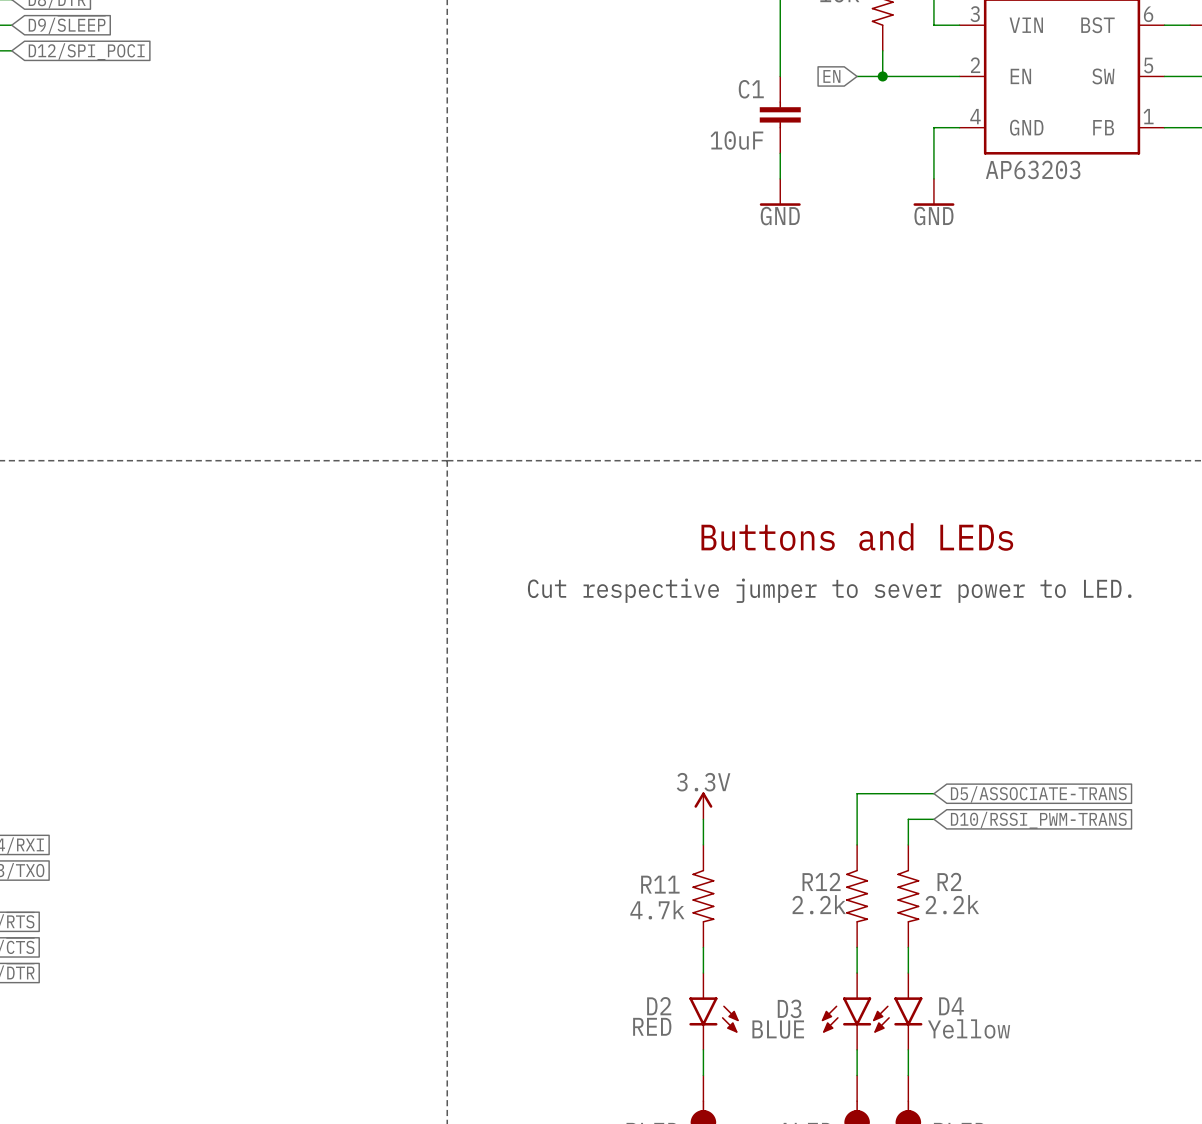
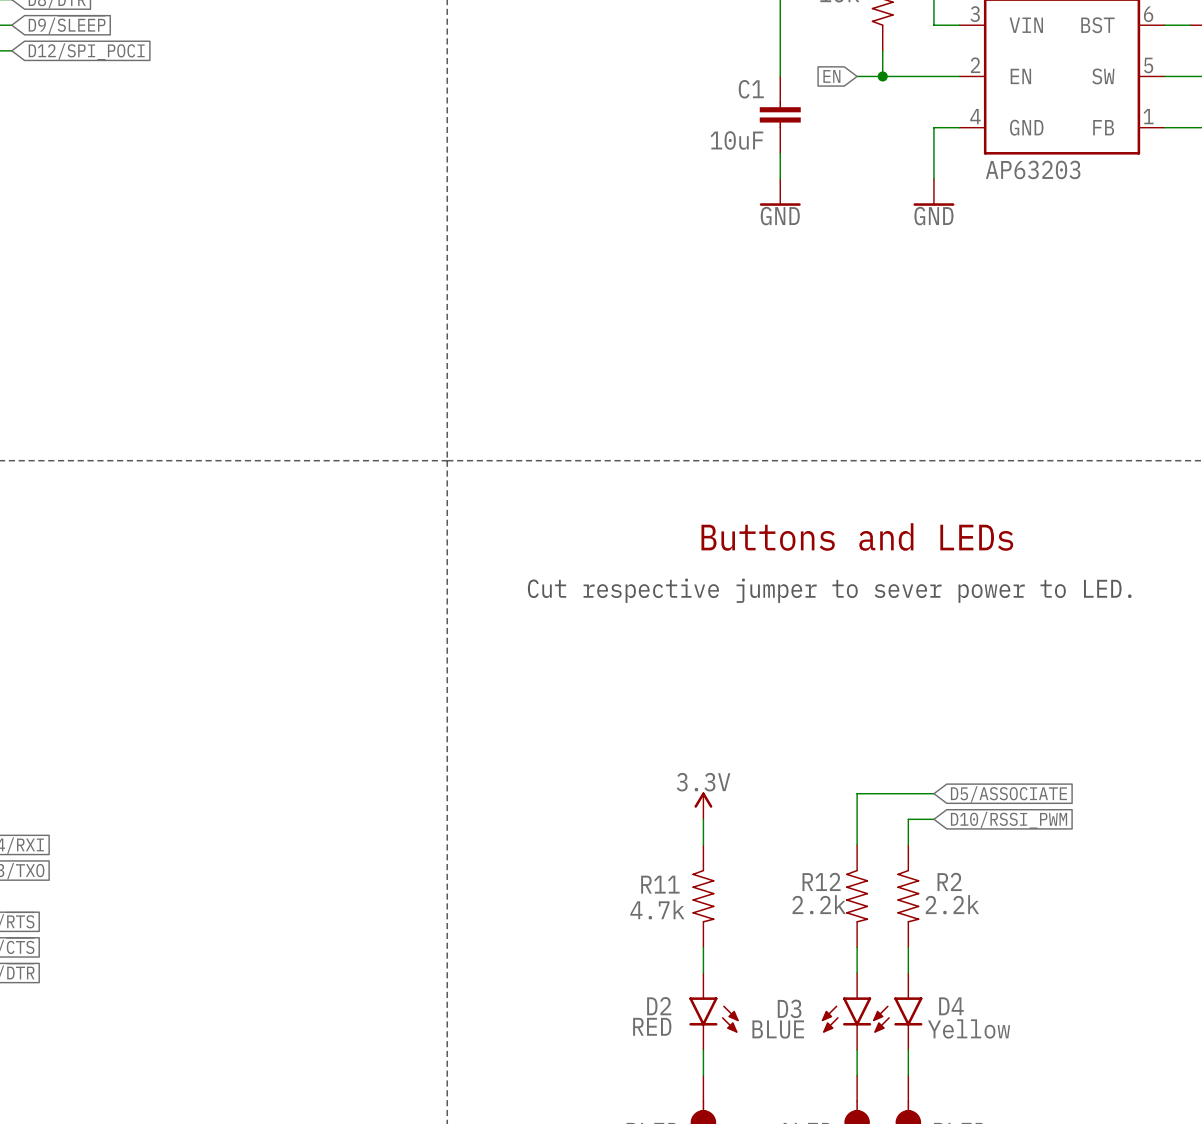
global label: D5/ASSOCIATE-TRANS (1038, 794) -> D5/ASSOCIATE (1008, 794)
global label: D10/RSSI_PWM-TRANS (1038, 820) -> D10/RSSI_PWM (1009, 820)

